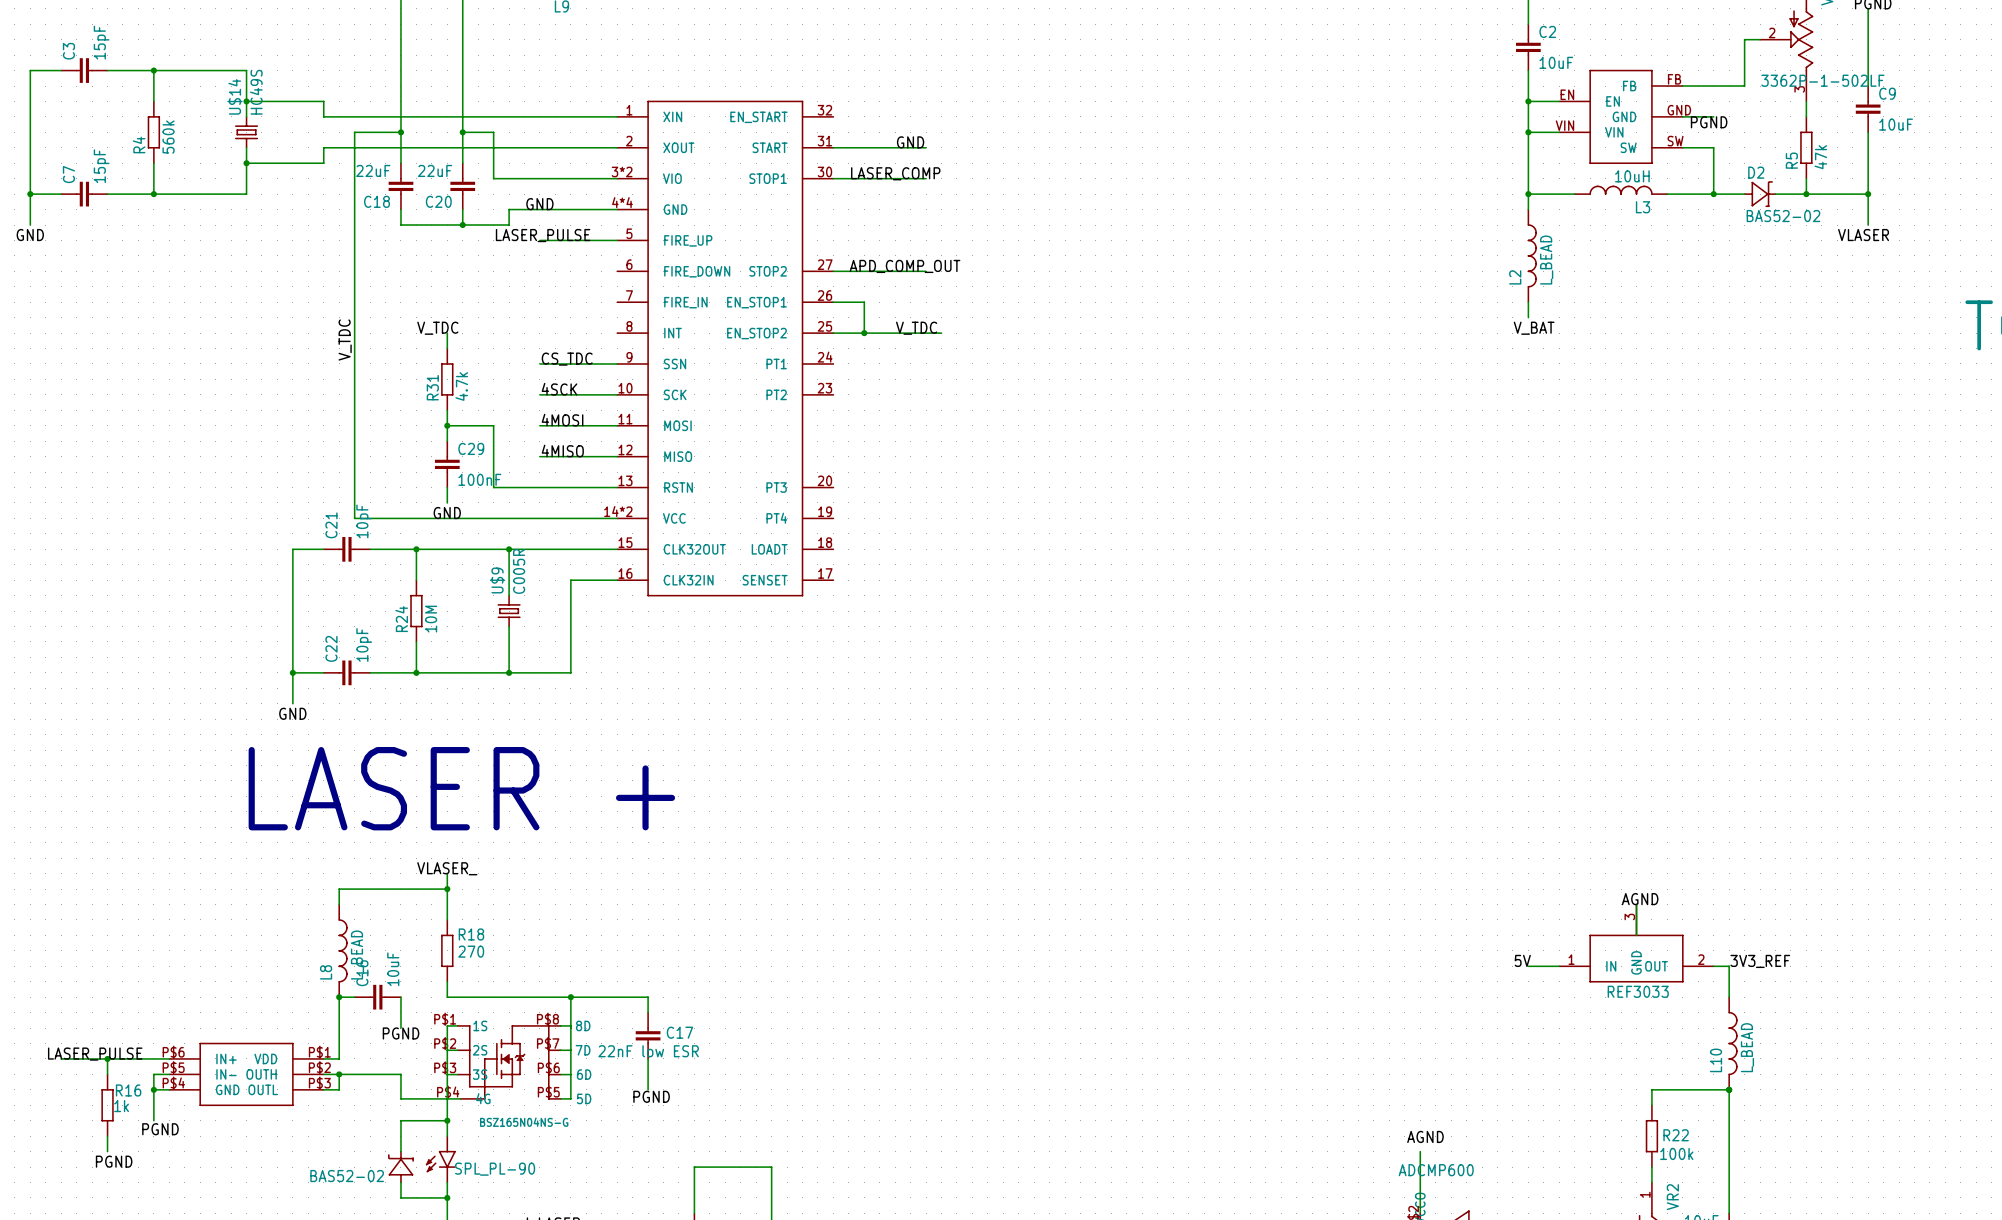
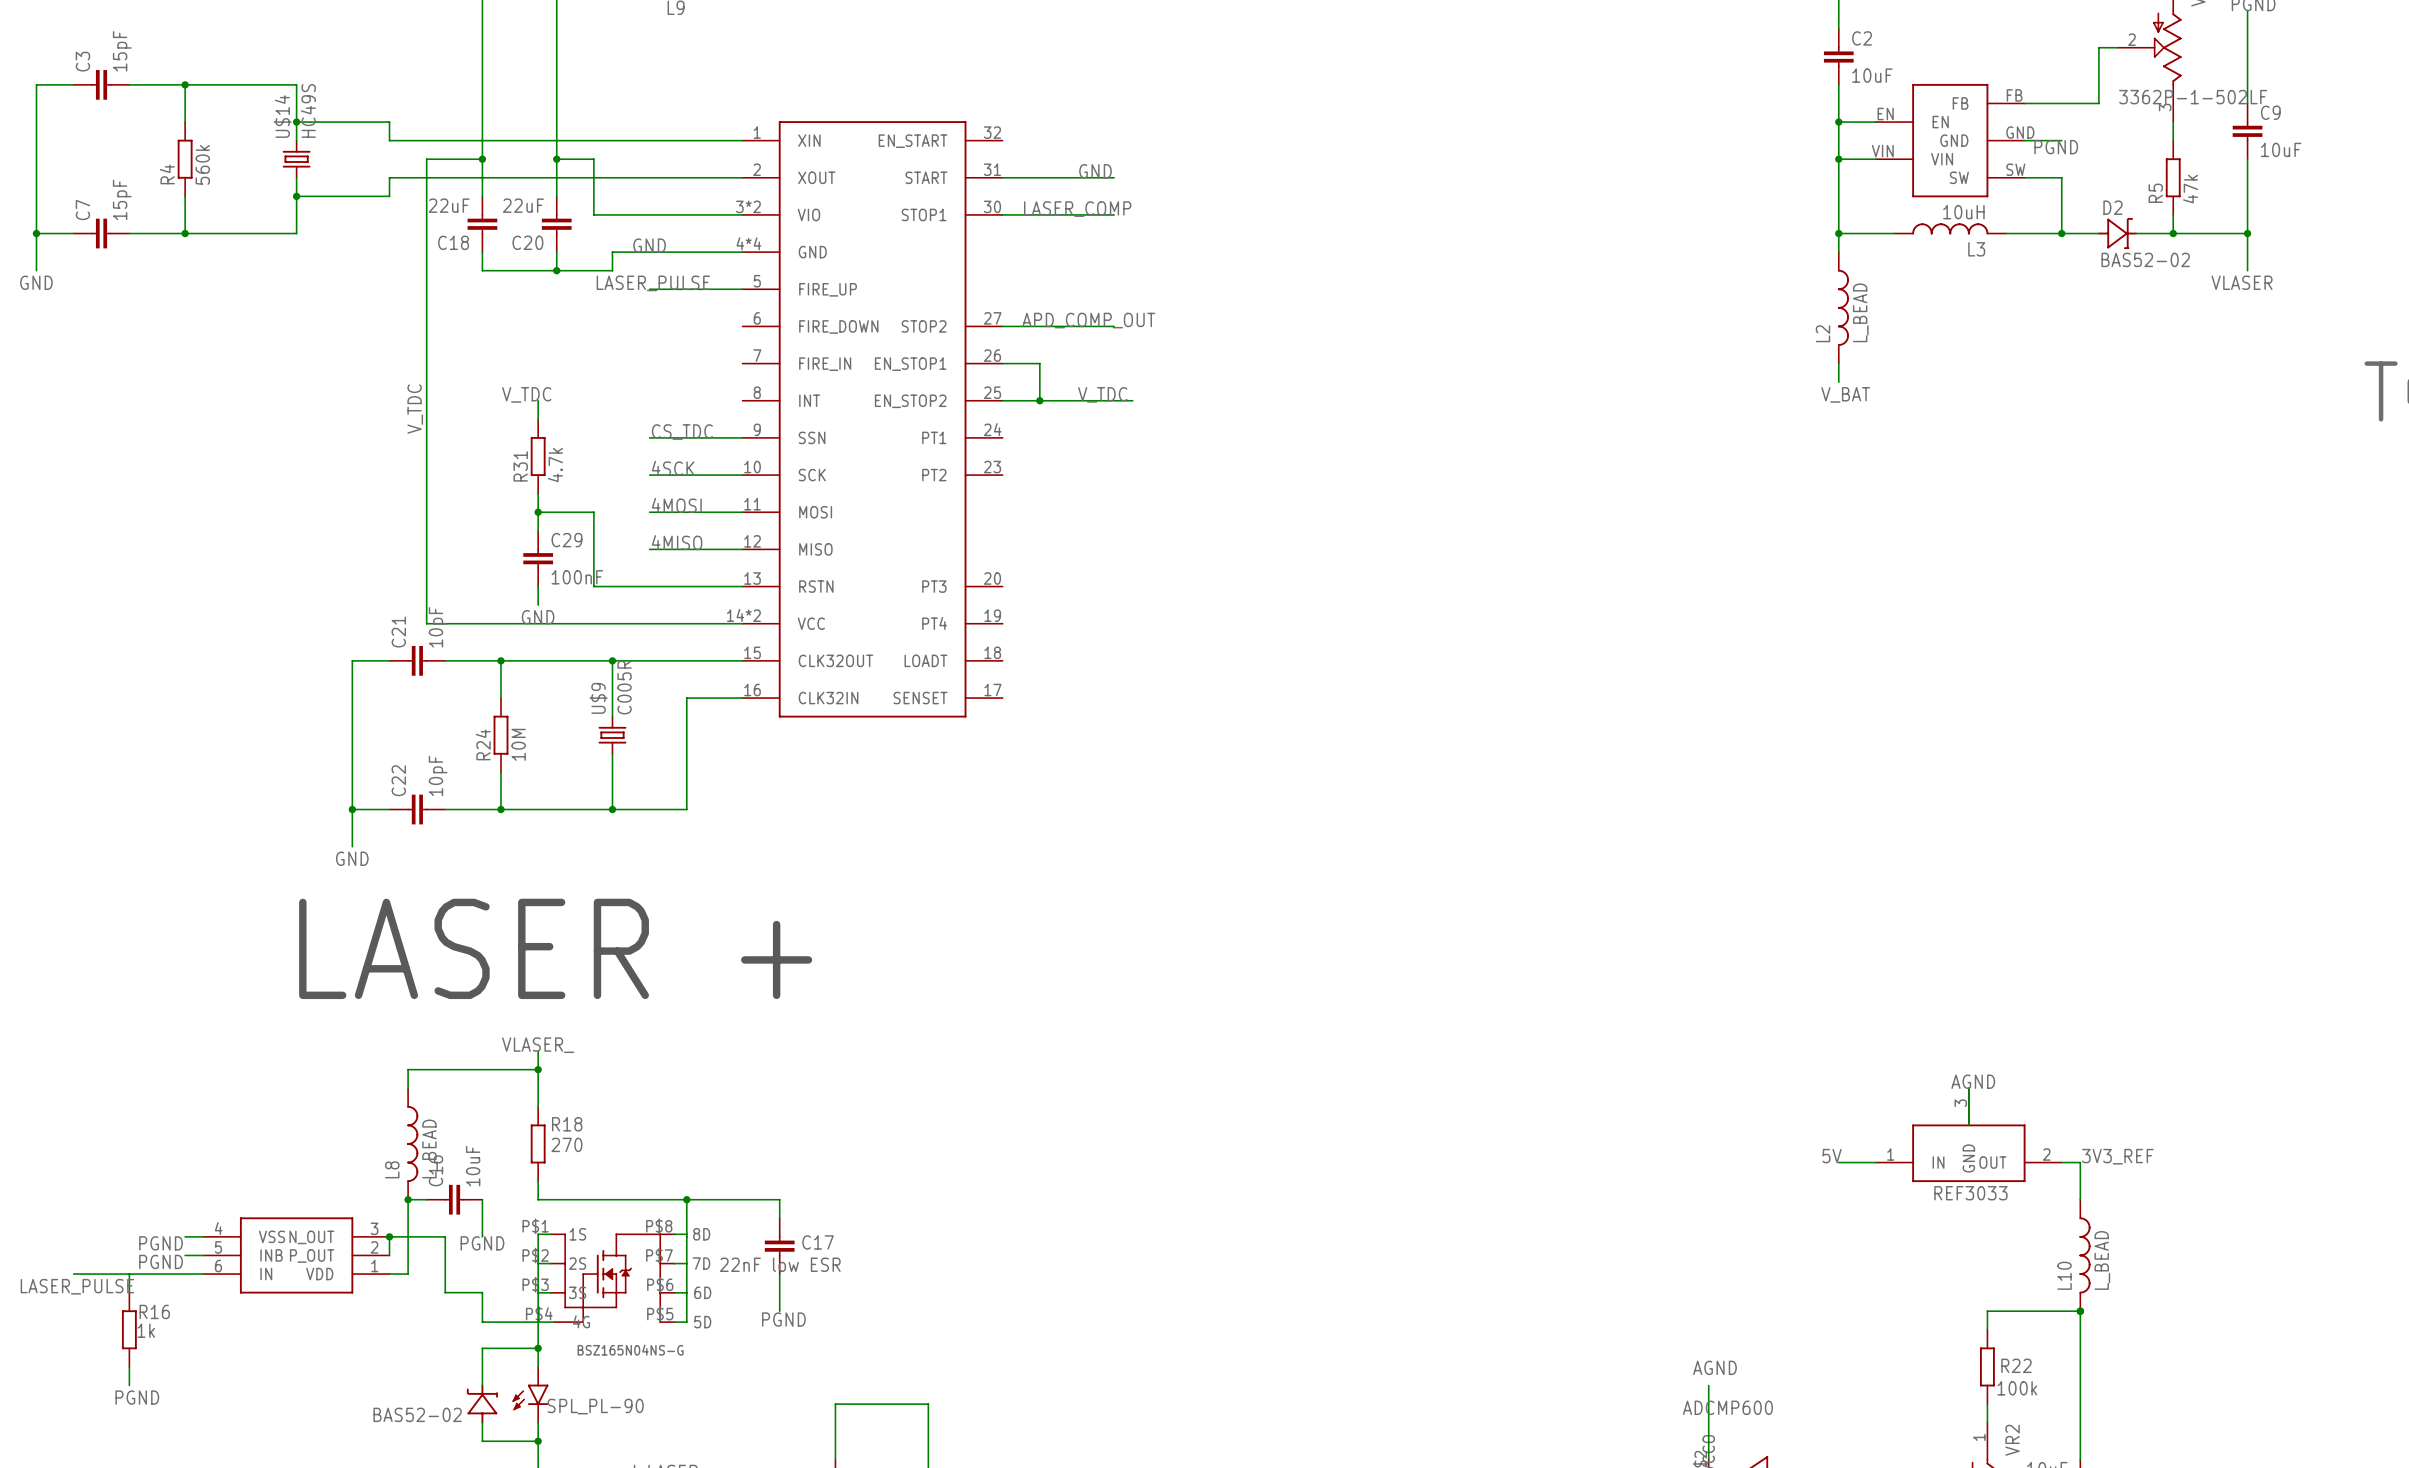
wire: none -> (185, 1236) (203, 1236)
junction: none -> (389, 1236)
label: none -> PGND (161, 1243)
part: none -> (296, 1255)
label: none -> PGND (161, 1261)
label position: LASER_PULSE (95, 1054) -> LASER_PULSE (77, 1286)
junction: (107, 1058) -> none
wire: (169, 1074) (153, 1074) (153, 1120) -> none
part: (246, 1074) -> none
wire: (323, 1074) (370, 1074) -> (389, 1255) (389, 1236) (445, 1236) (445, 1292)
wire: (339, 1074) (339, 1089) (323, 1089) -> none
junction: (339, 1074) -> none
wire: (153, 1089) (169, 1089) -> (185, 1255) (203, 1255)
junction: (153, 1089) -> none
label: PGND (160, 1129) -> none

